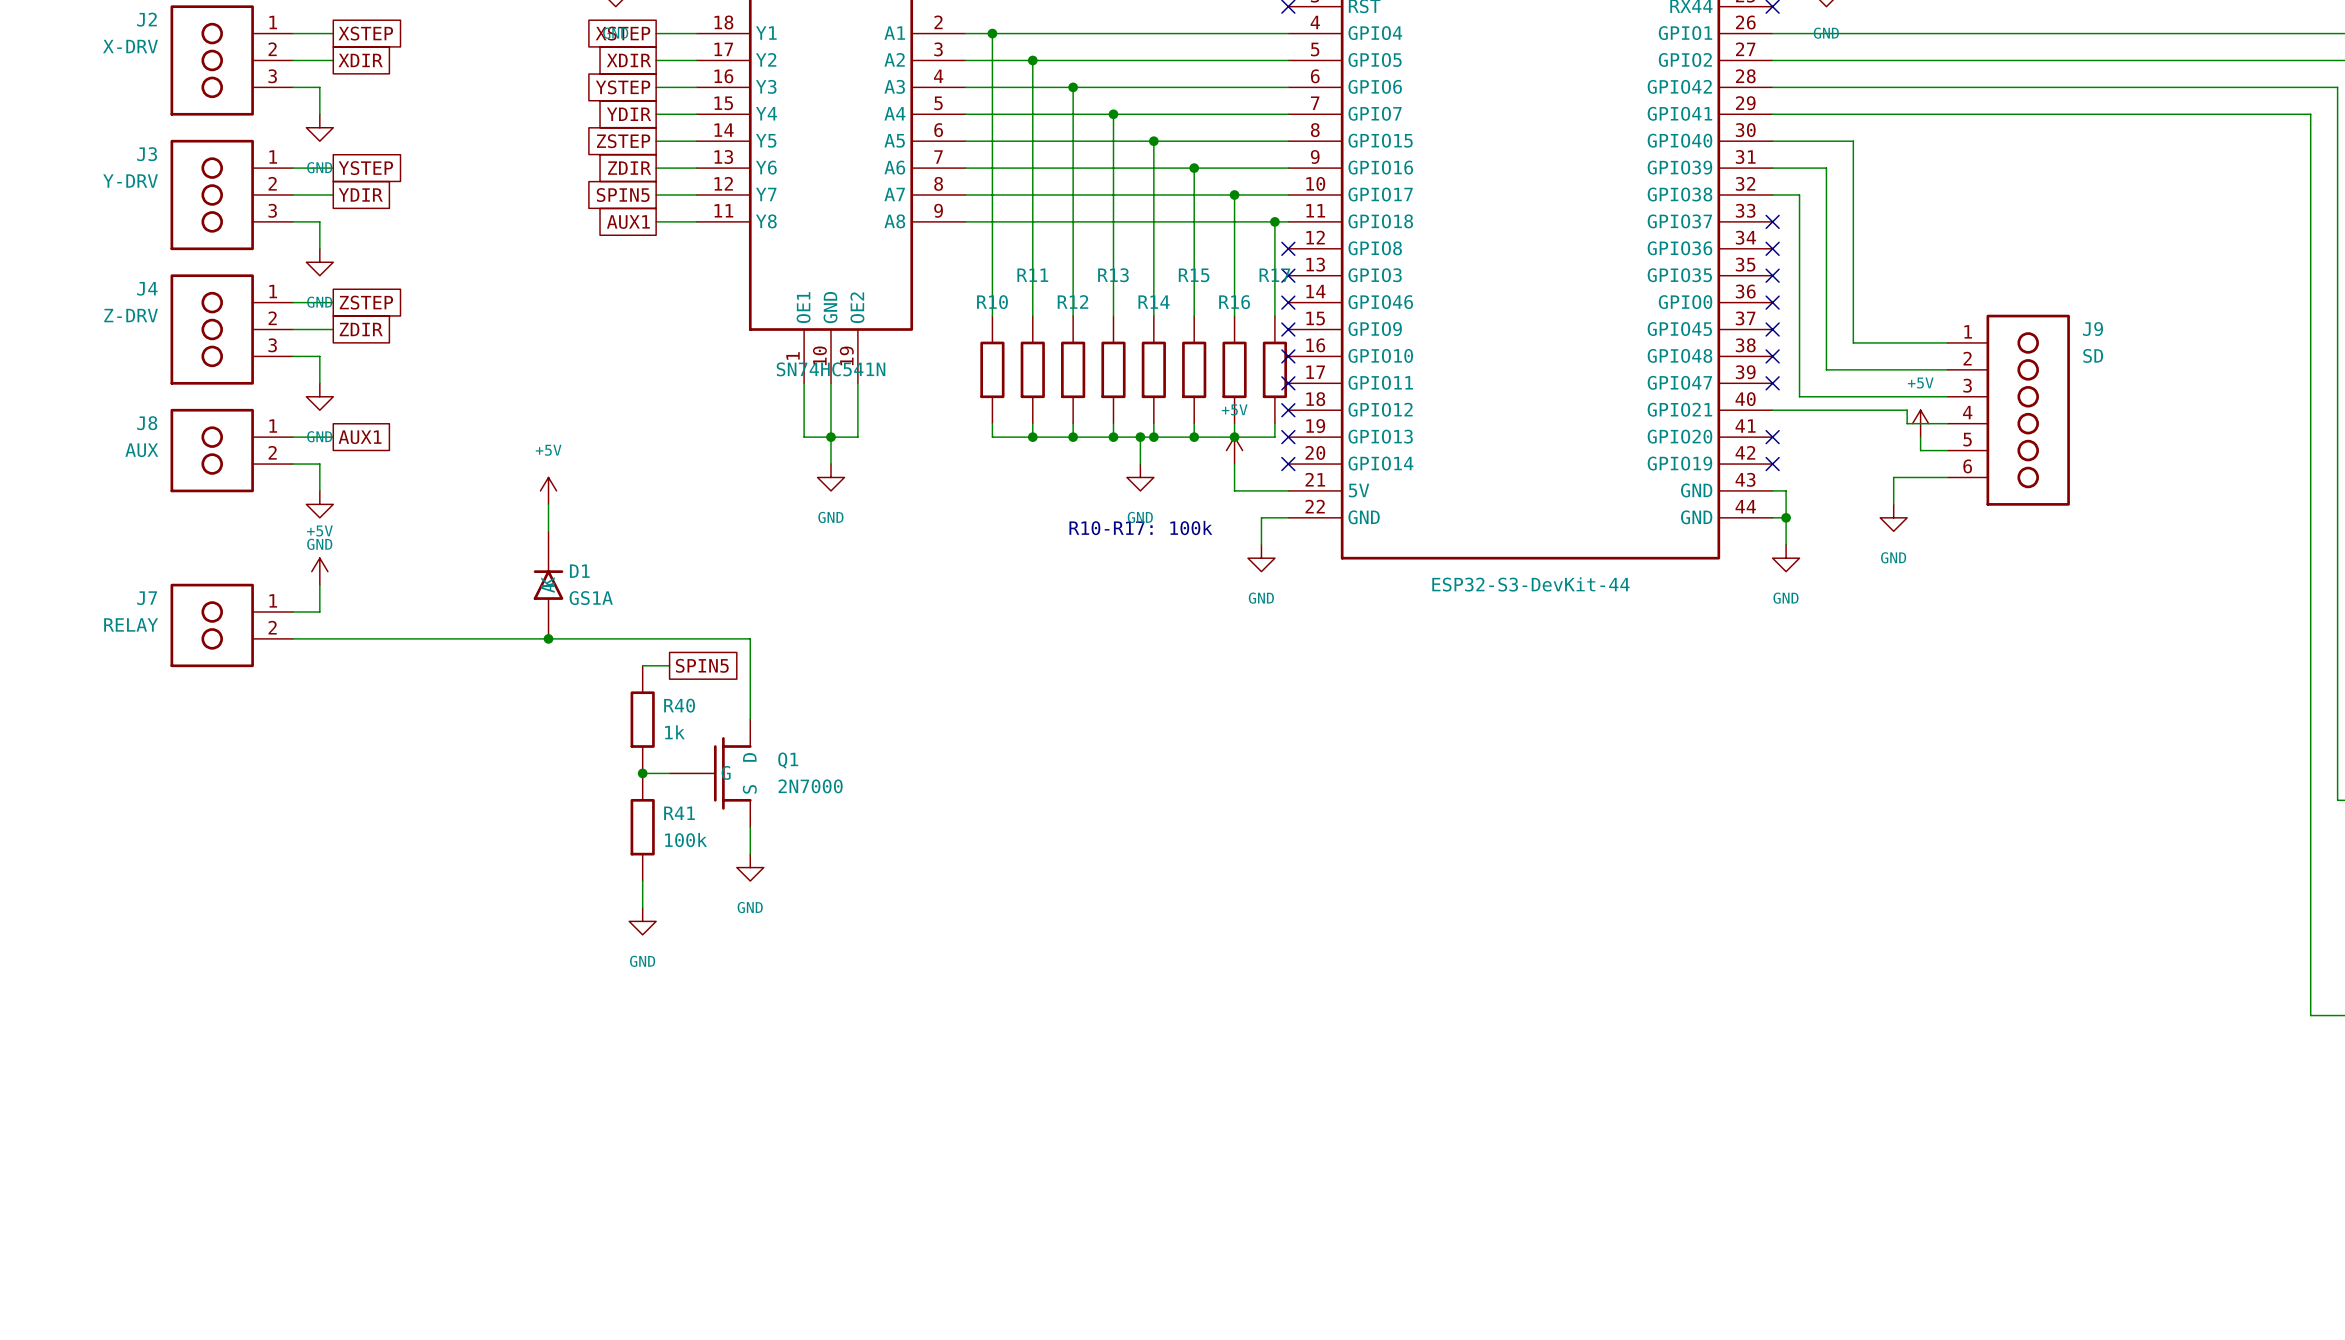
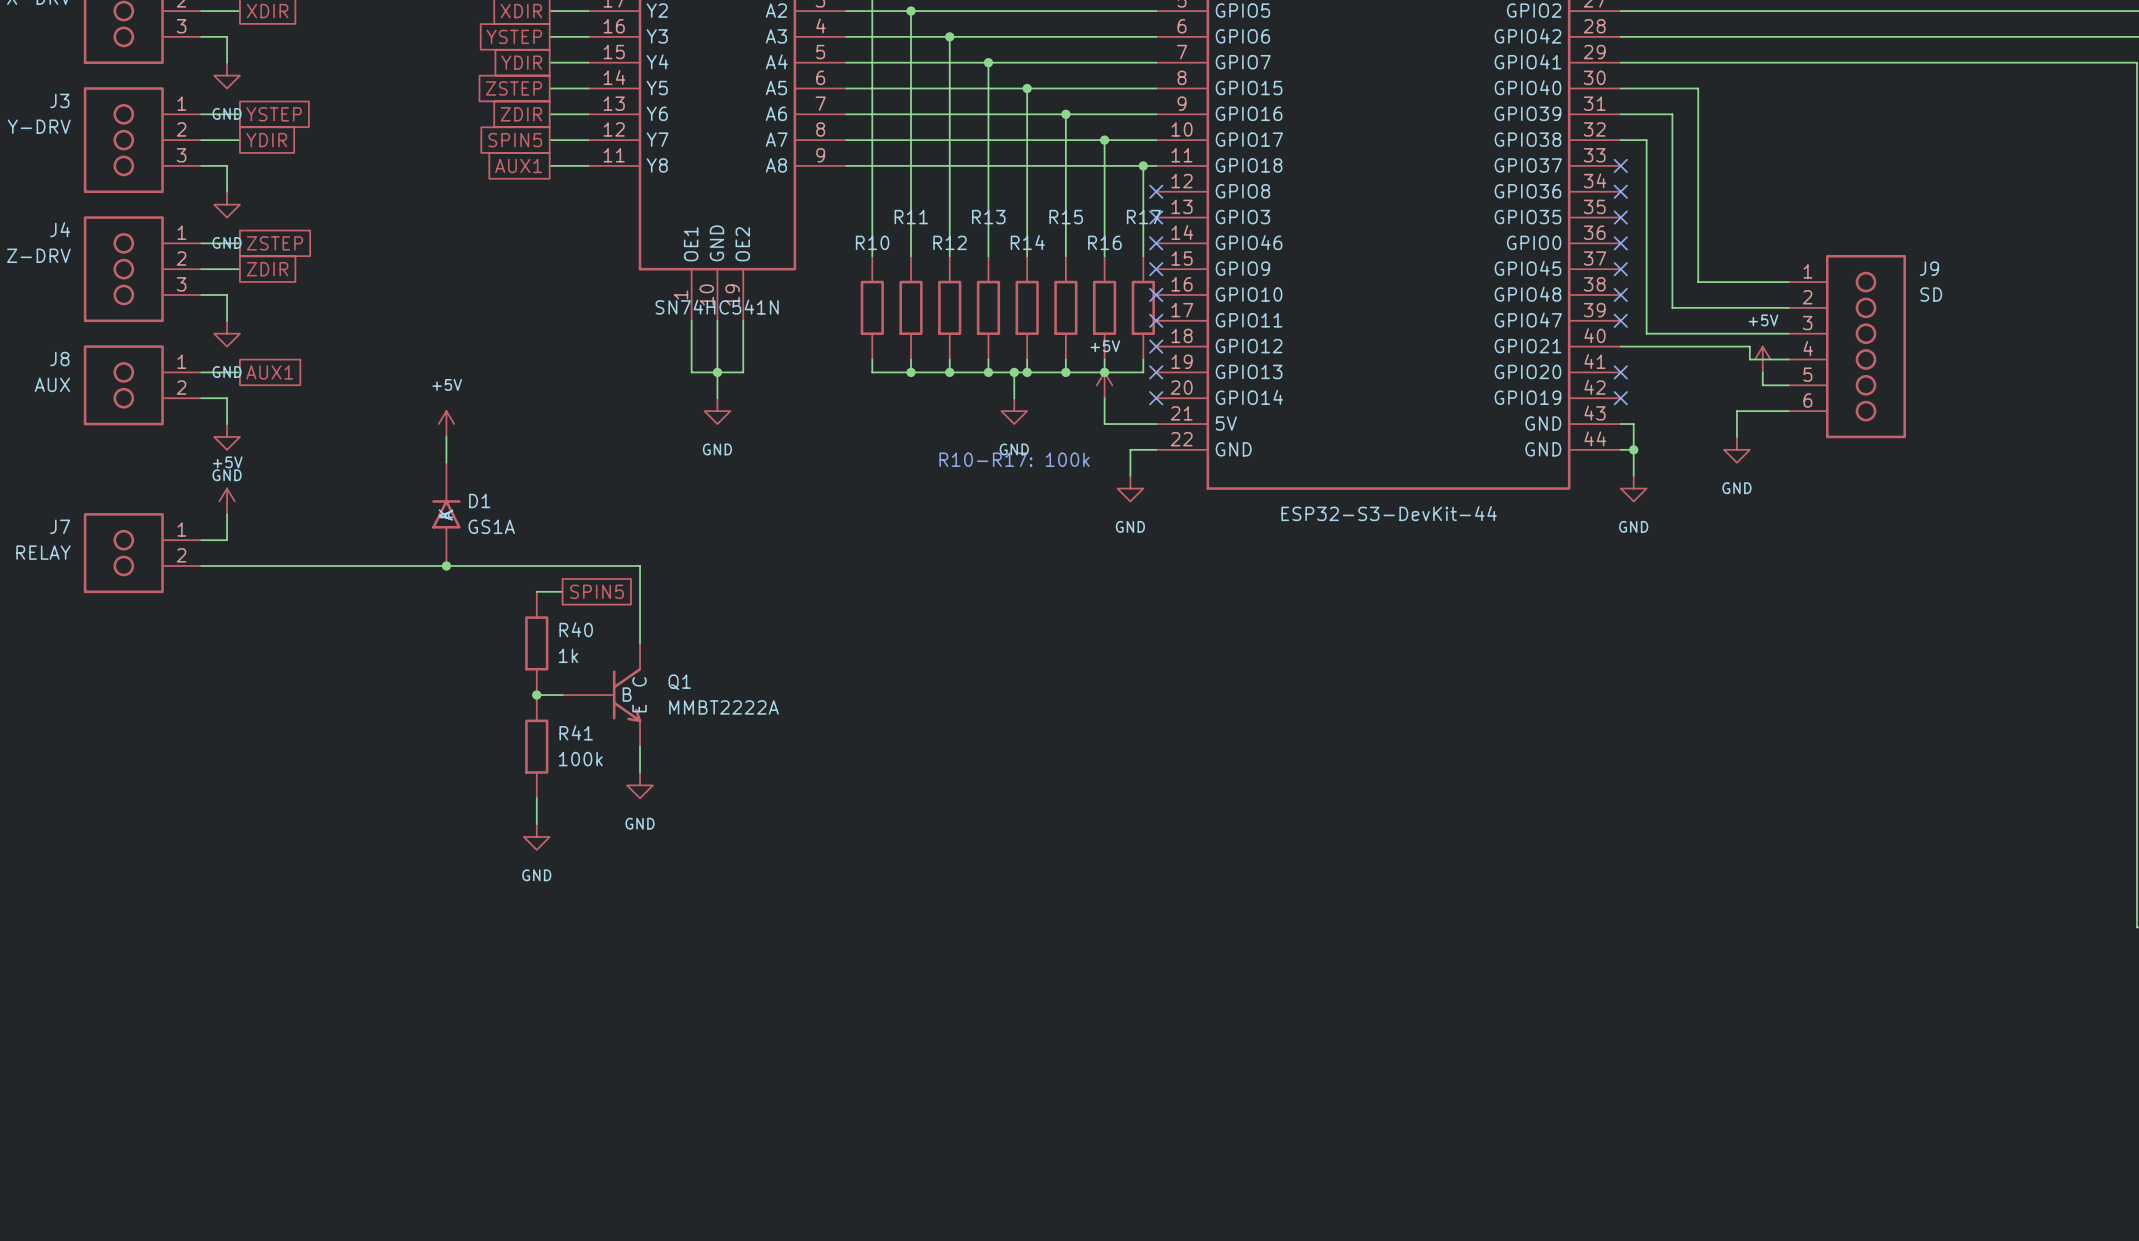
Q1 symbol: [669, 719, 752, 828] -> [562, 643, 642, 747]
Q1 value: 2N7000 (810, 786) -> MMBT2222A (723, 707)

